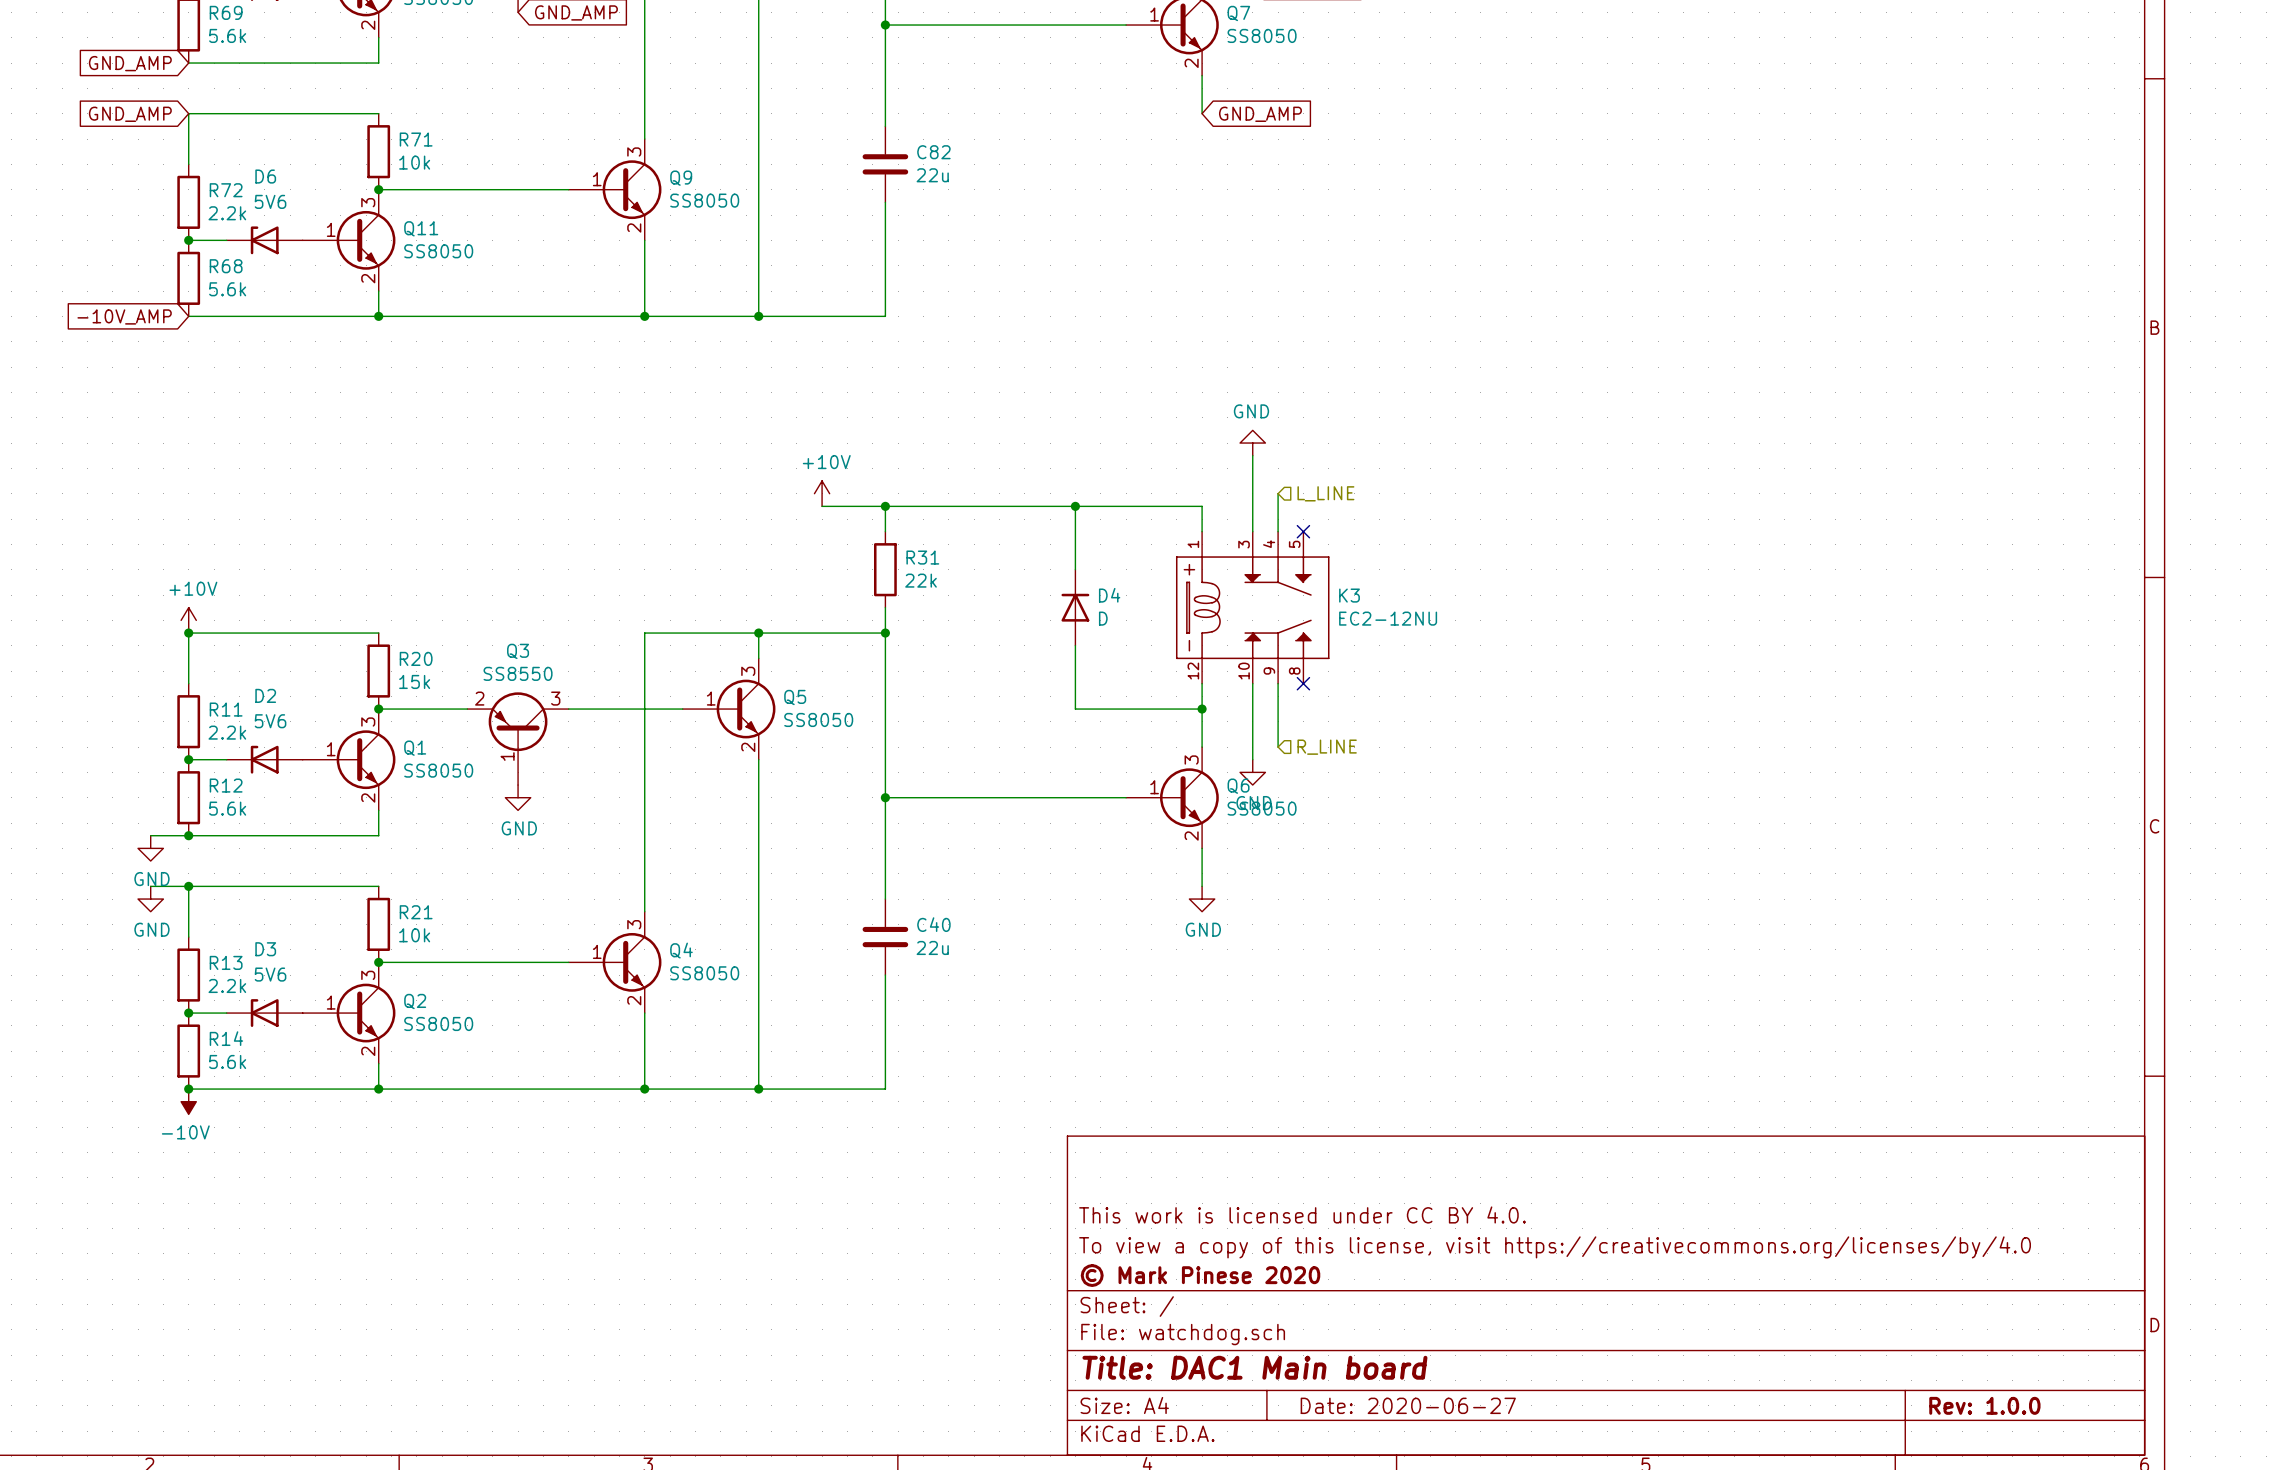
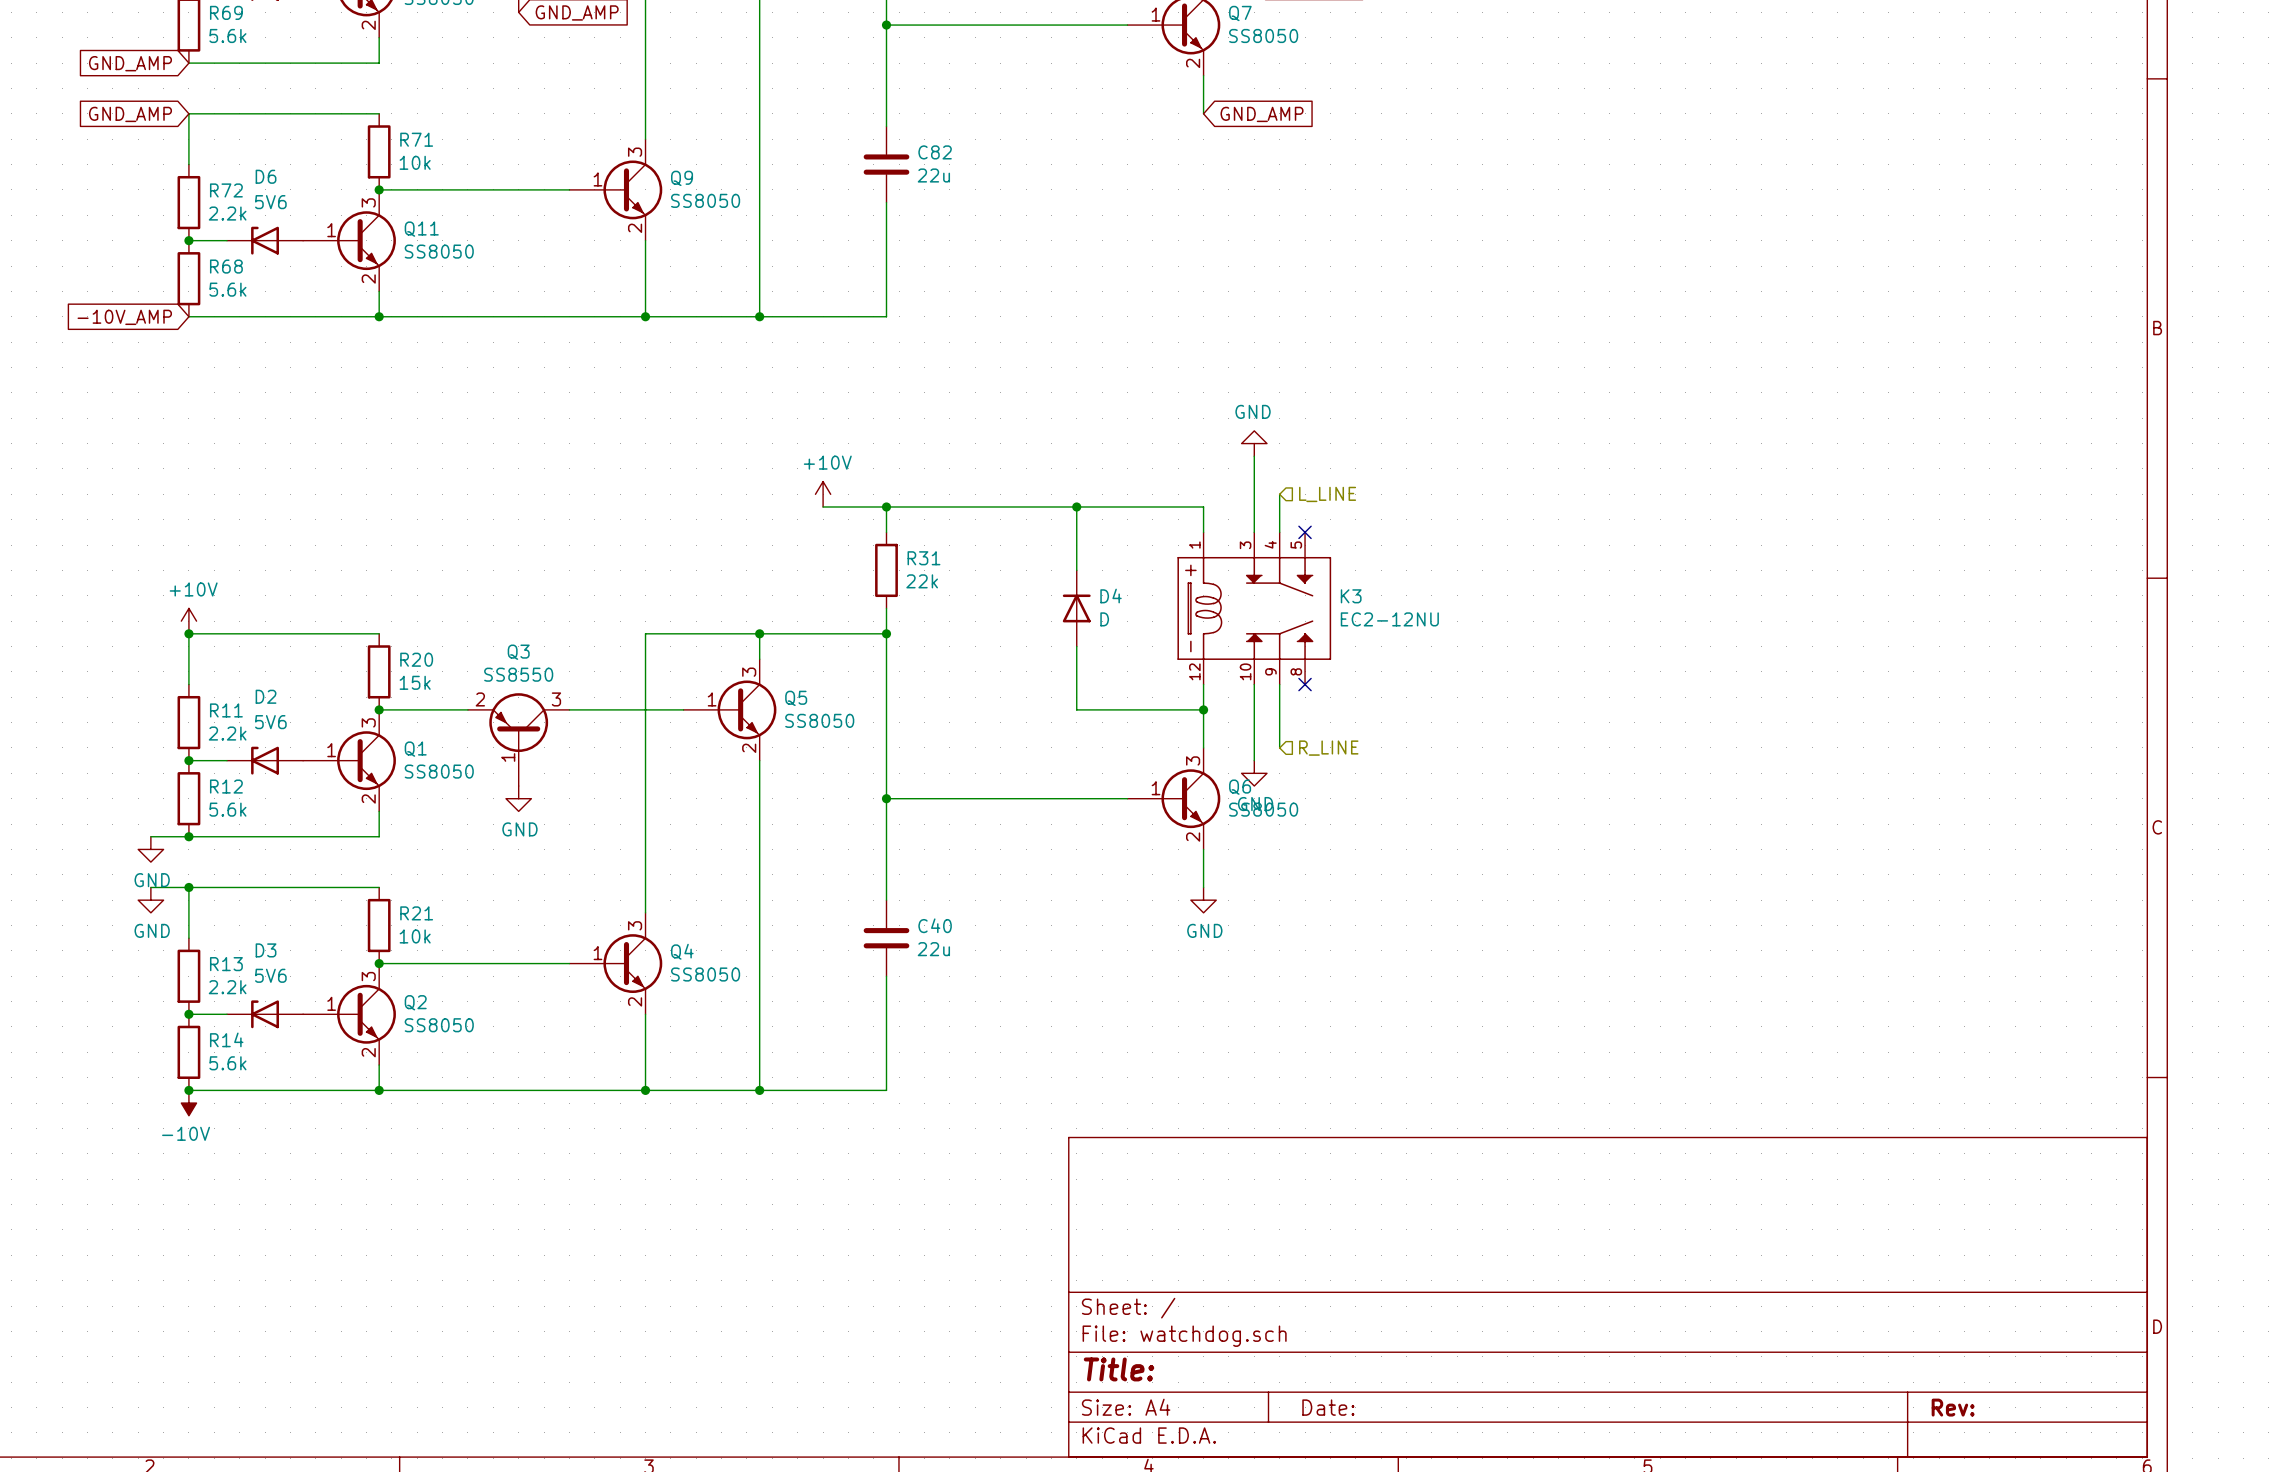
title block: This work is licensed under CC BY 4.0. (1302, 1214) -> none
title block: To view a copy of this license, visit https://creativecommons.org/licenses/by/4.0 (1555, 1247) -> none
title block: © Mark Pinese 2020 (1200, 1275) -> none
title block: Title: DAC1 Main board (1254, 1367) -> Title: (1119, 1369)
title block: Date: 2020-06-27 (1408, 1405) -> Date: (1328, 1407)
title block: Rev: 1.0.0 (1984, 1405) -> Rev: (1953, 1407)

